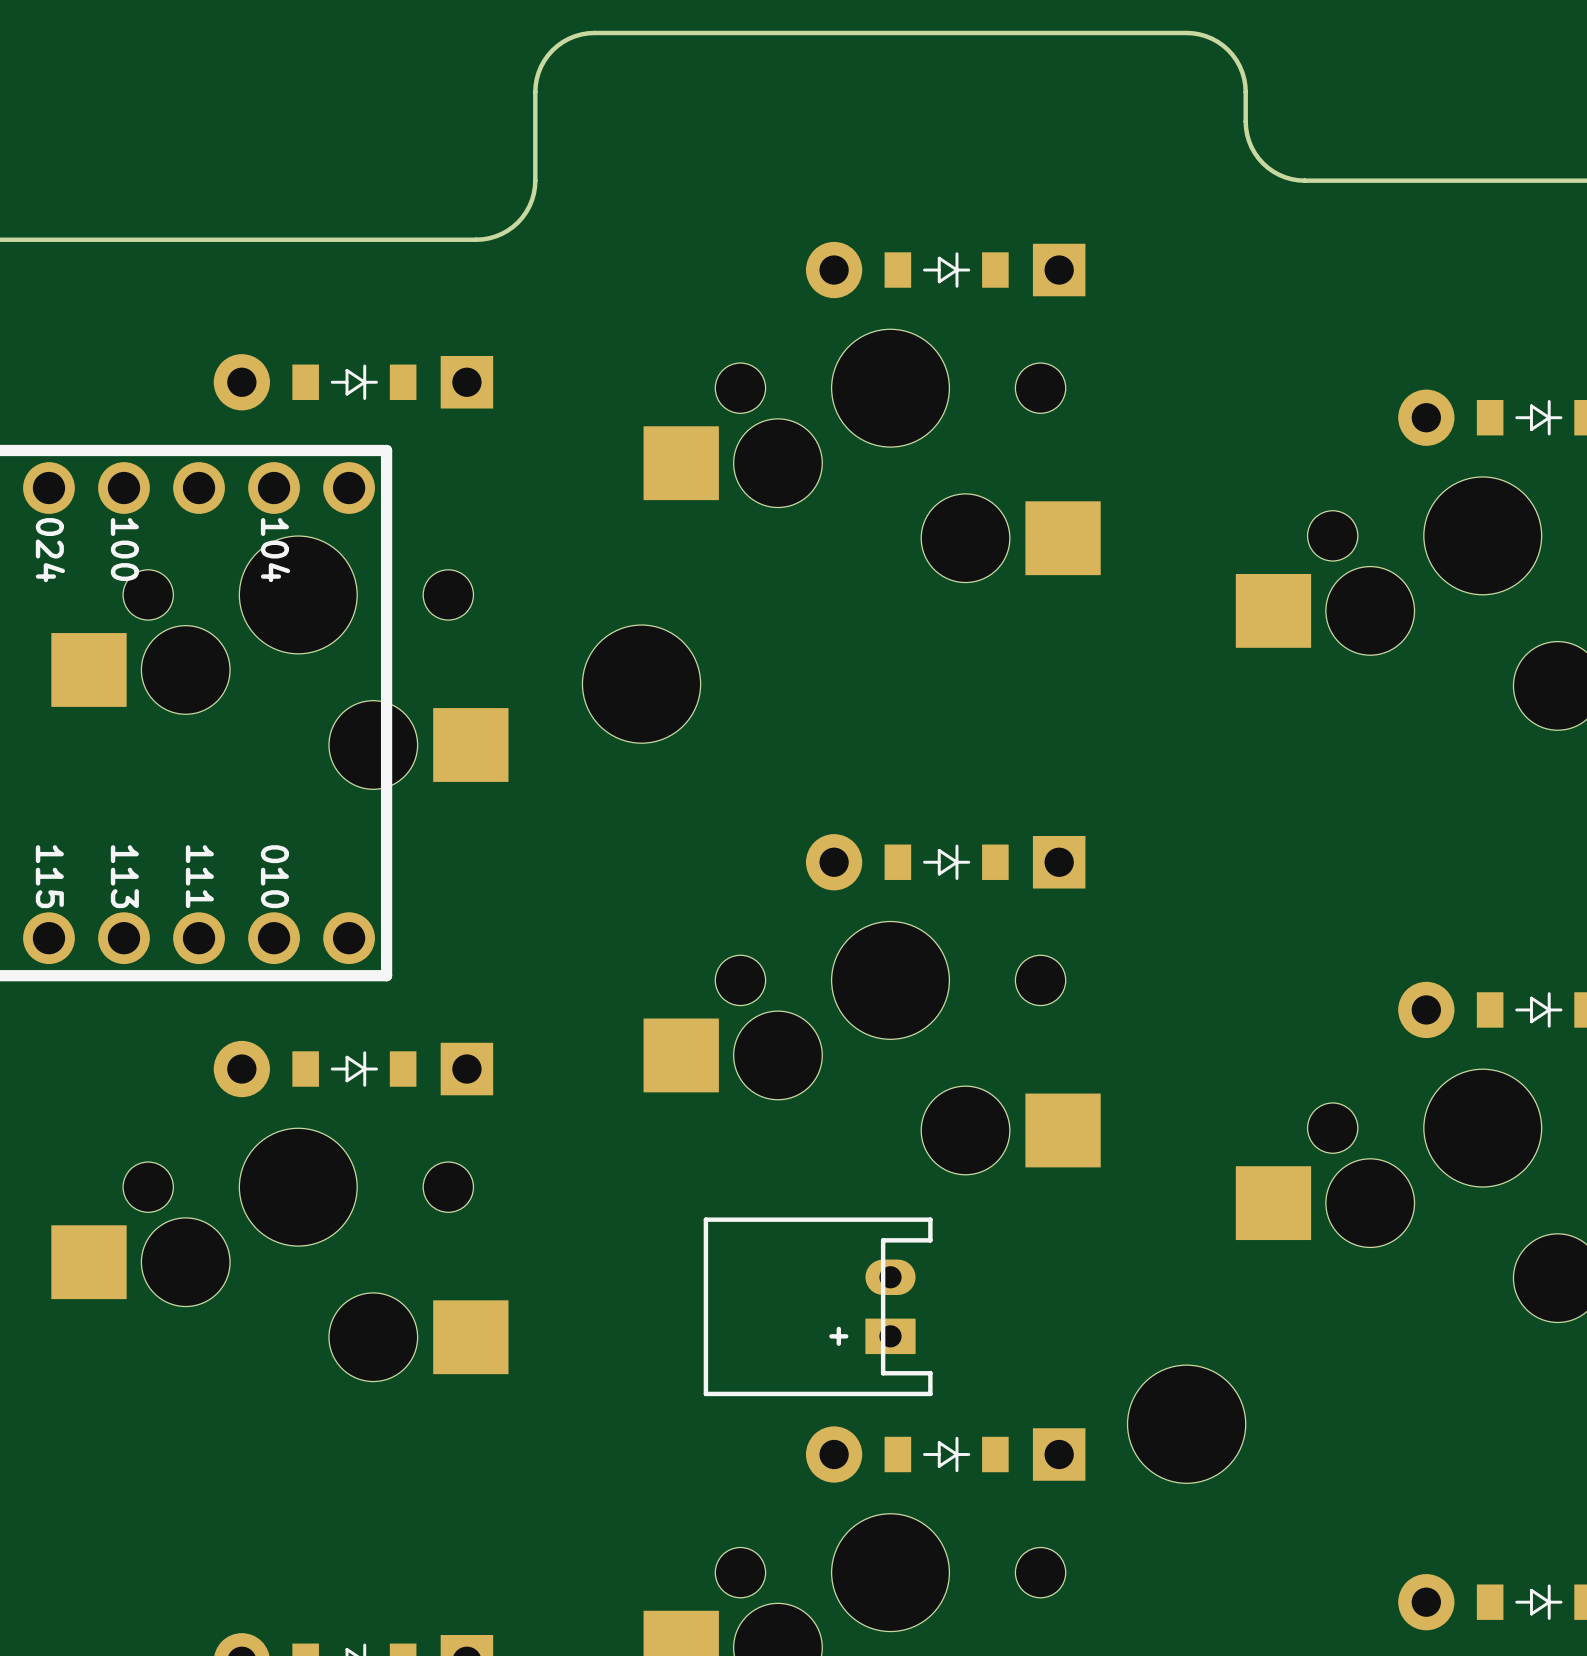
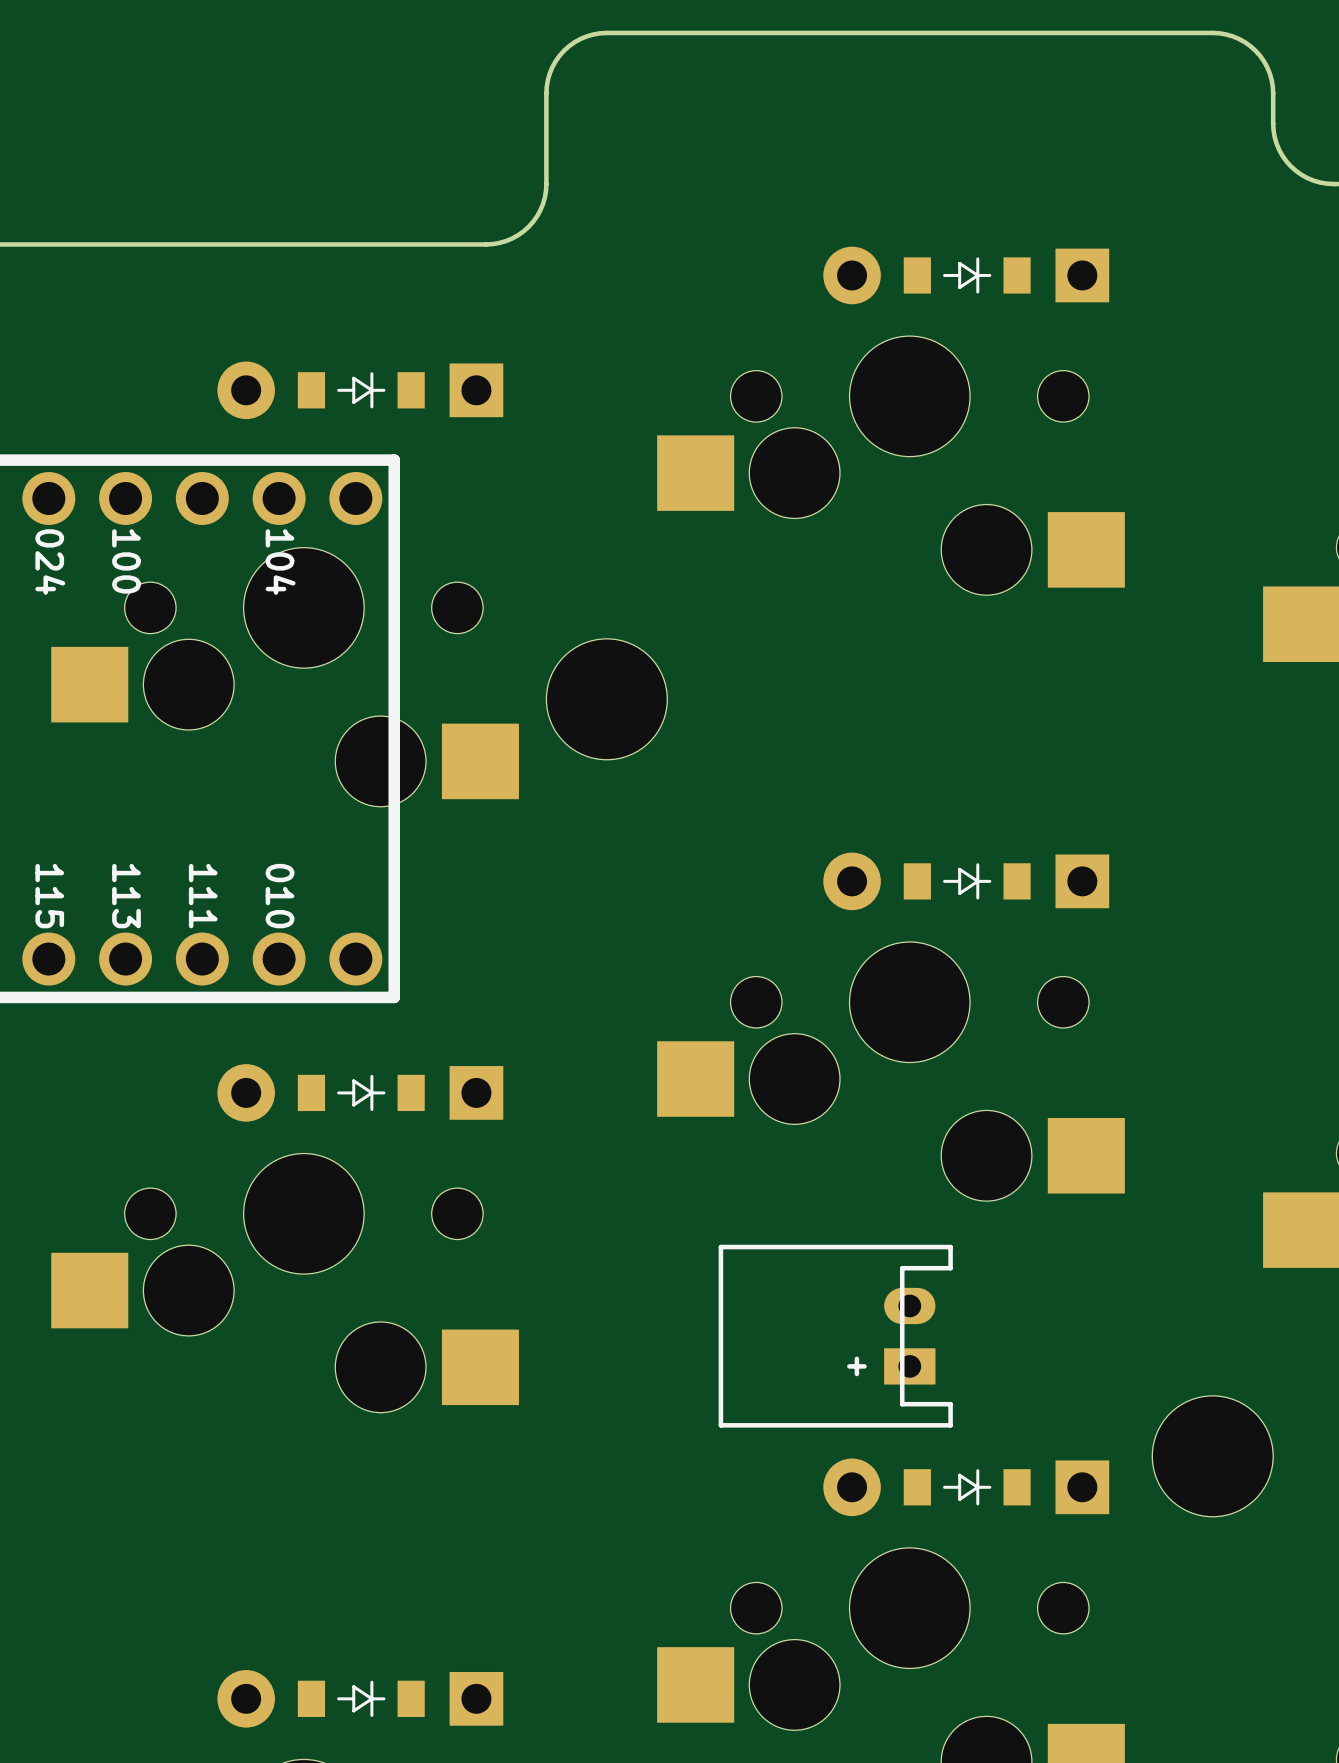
part position: (641, 684) -> (606, 699)

